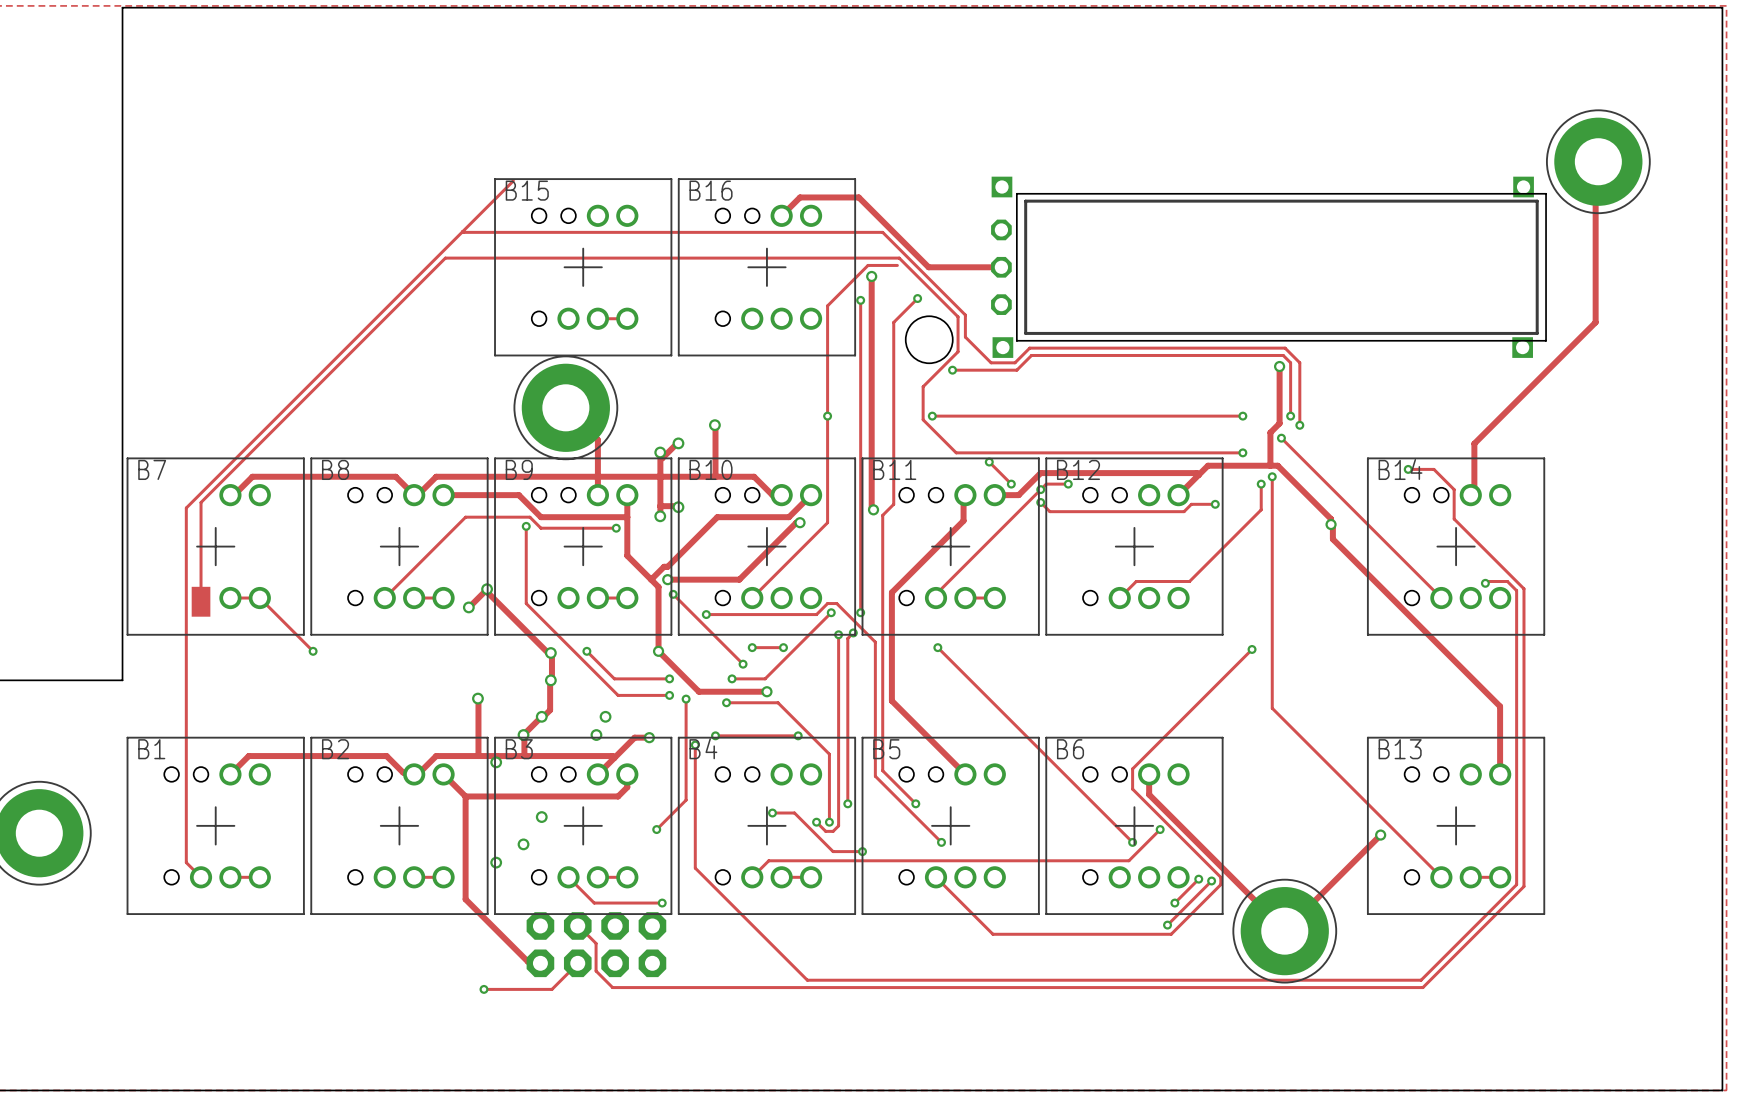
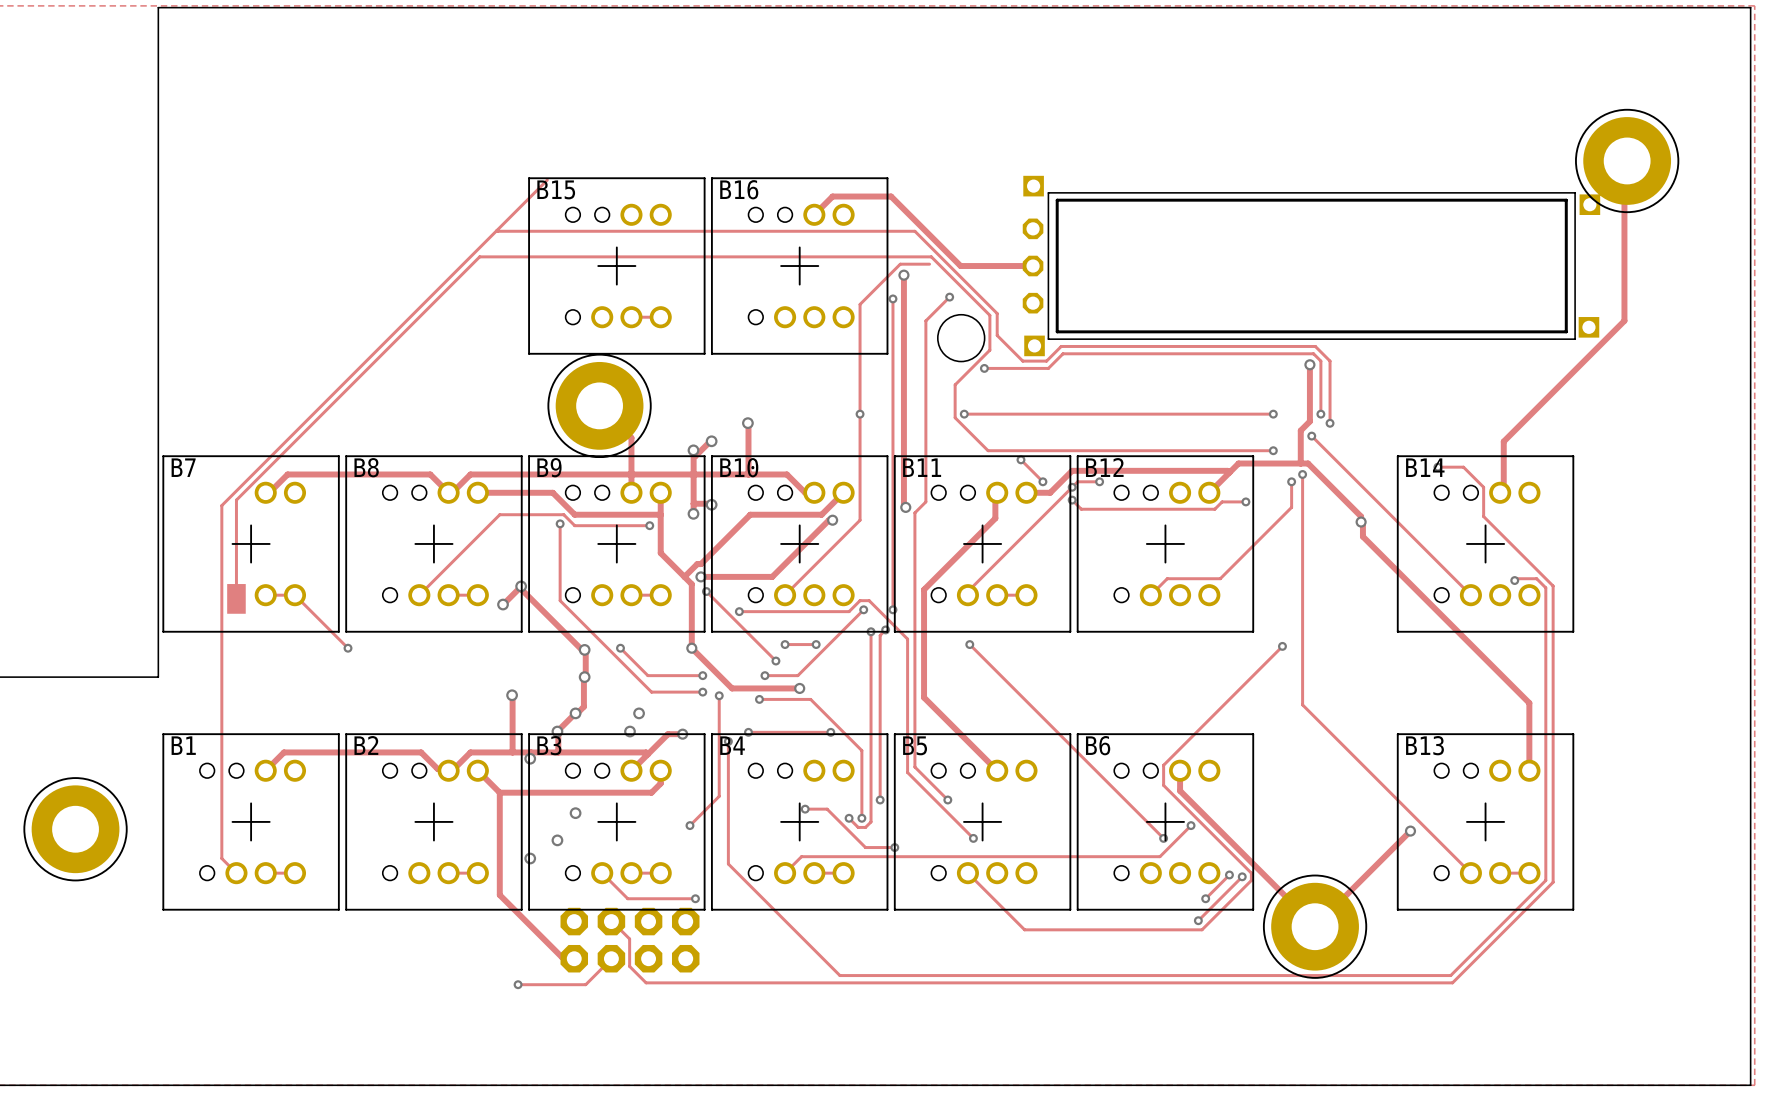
part: (1264, 267) -> none
part: none -> (1311, 266)

